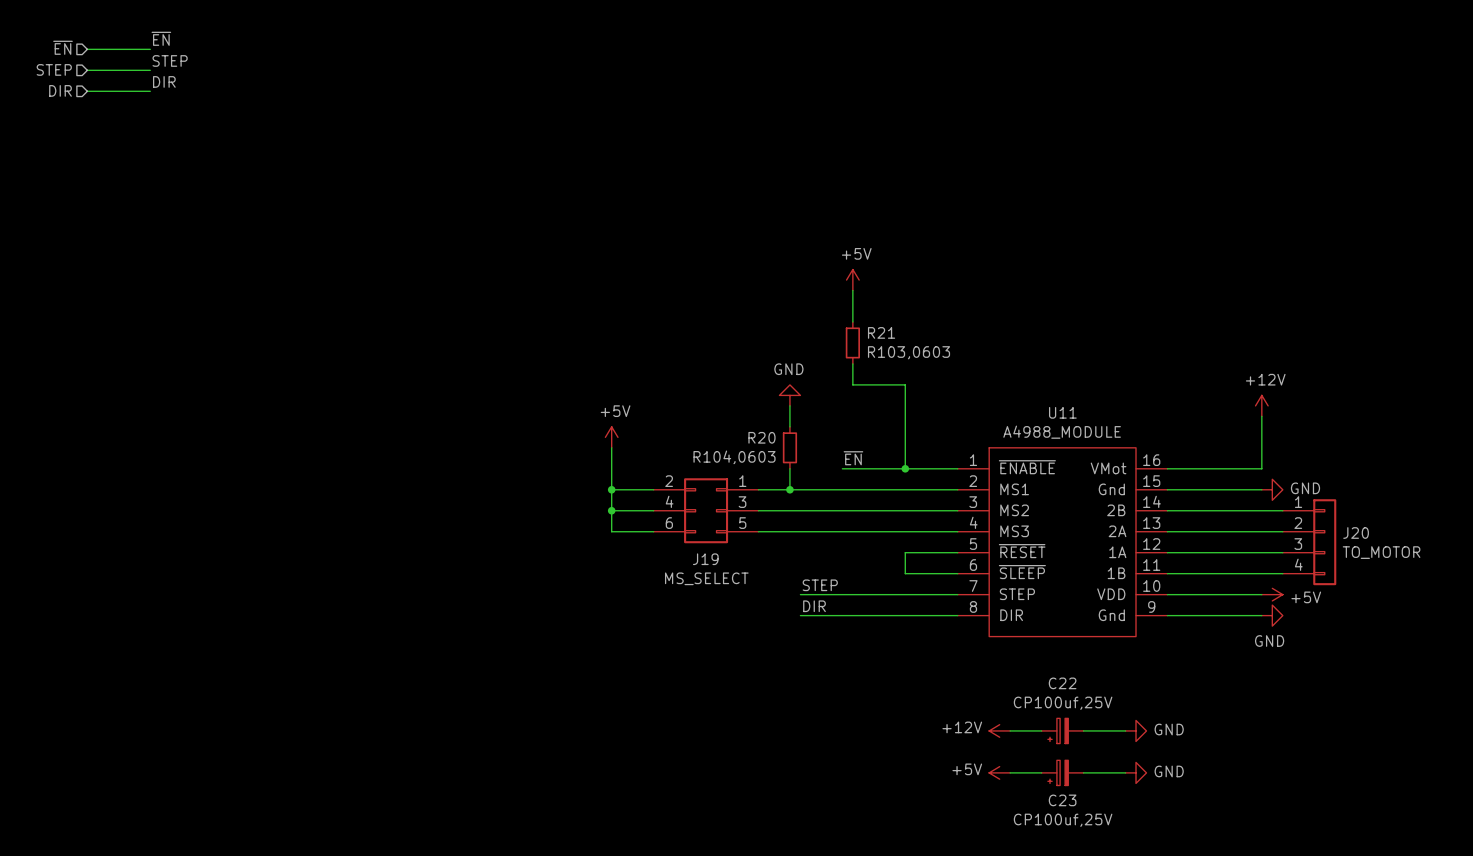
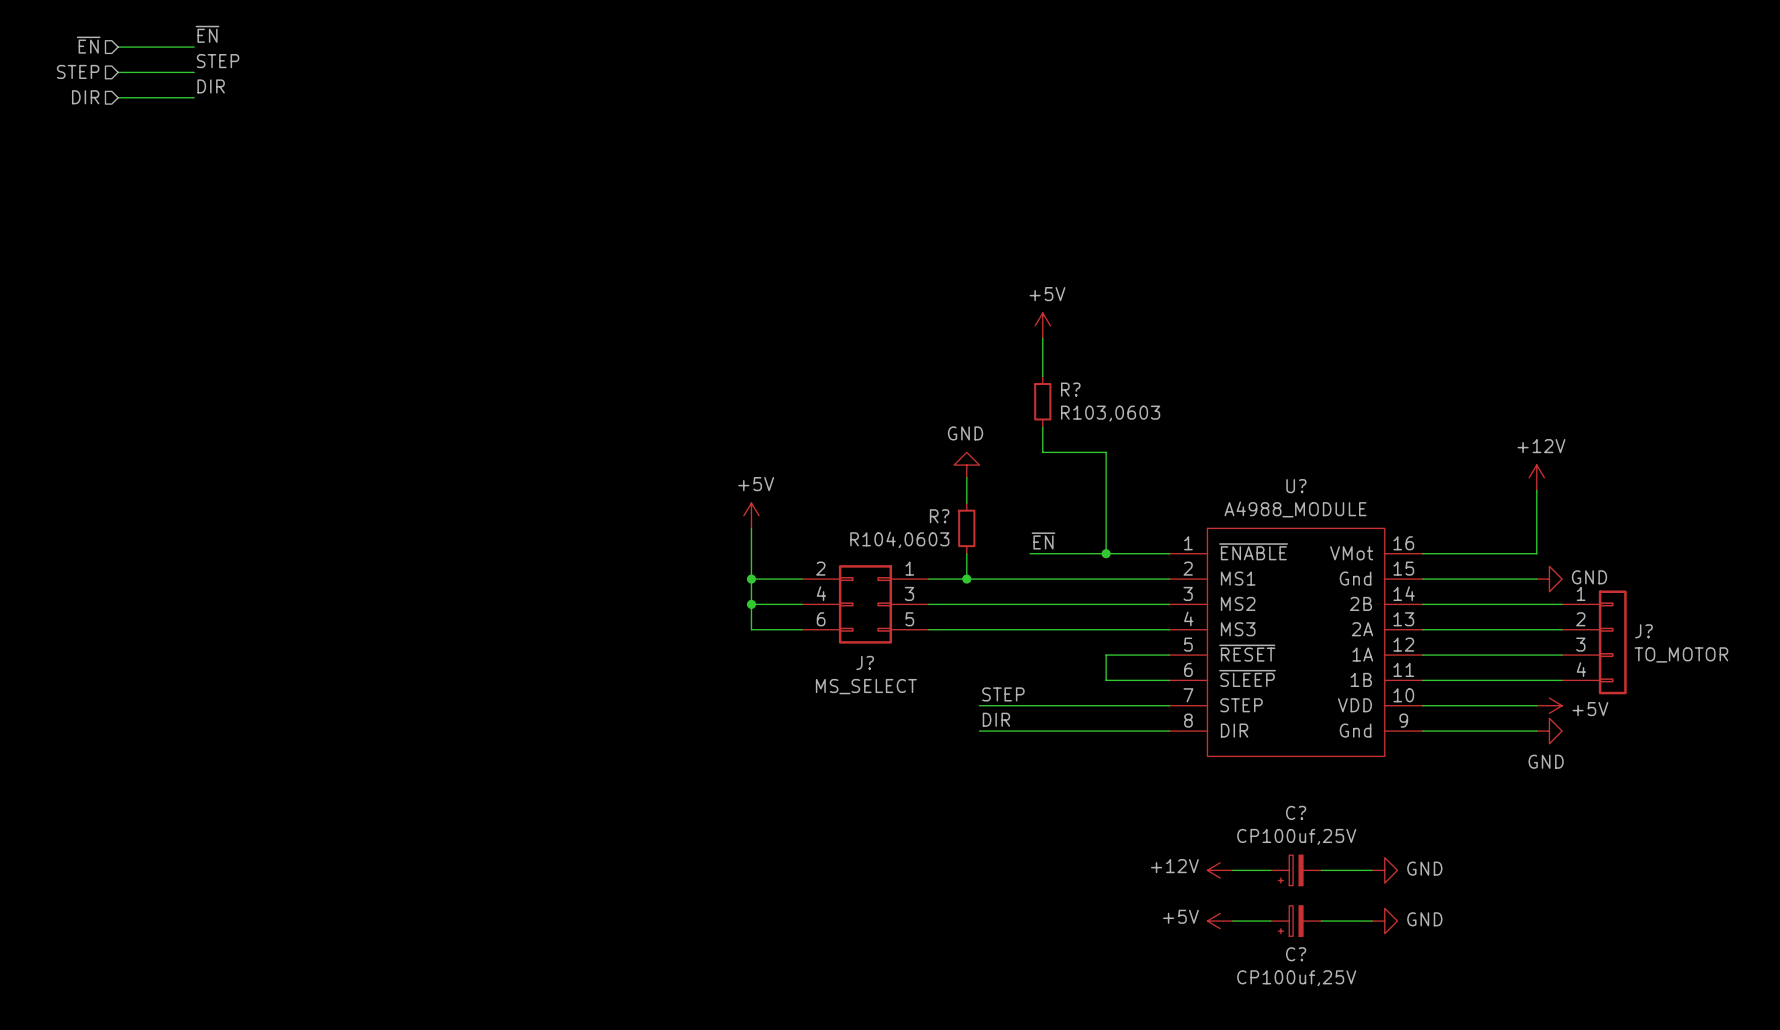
R21 name: R21 (881, 332) -> R? (1070, 389)
U11 name: U11 (1062, 412) -> U? (1296, 486)
R20 name: R20 (761, 437) -> R? (939, 516)
J20 name: J20 (1356, 533) -> J? (1643, 631)
J19 name: J19 (705, 559) -> J? (865, 662)
C22 name: C22 (1062, 683) -> C? (1296, 812)
C23 name: C23 (1062, 800) -> C? (1296, 954)

